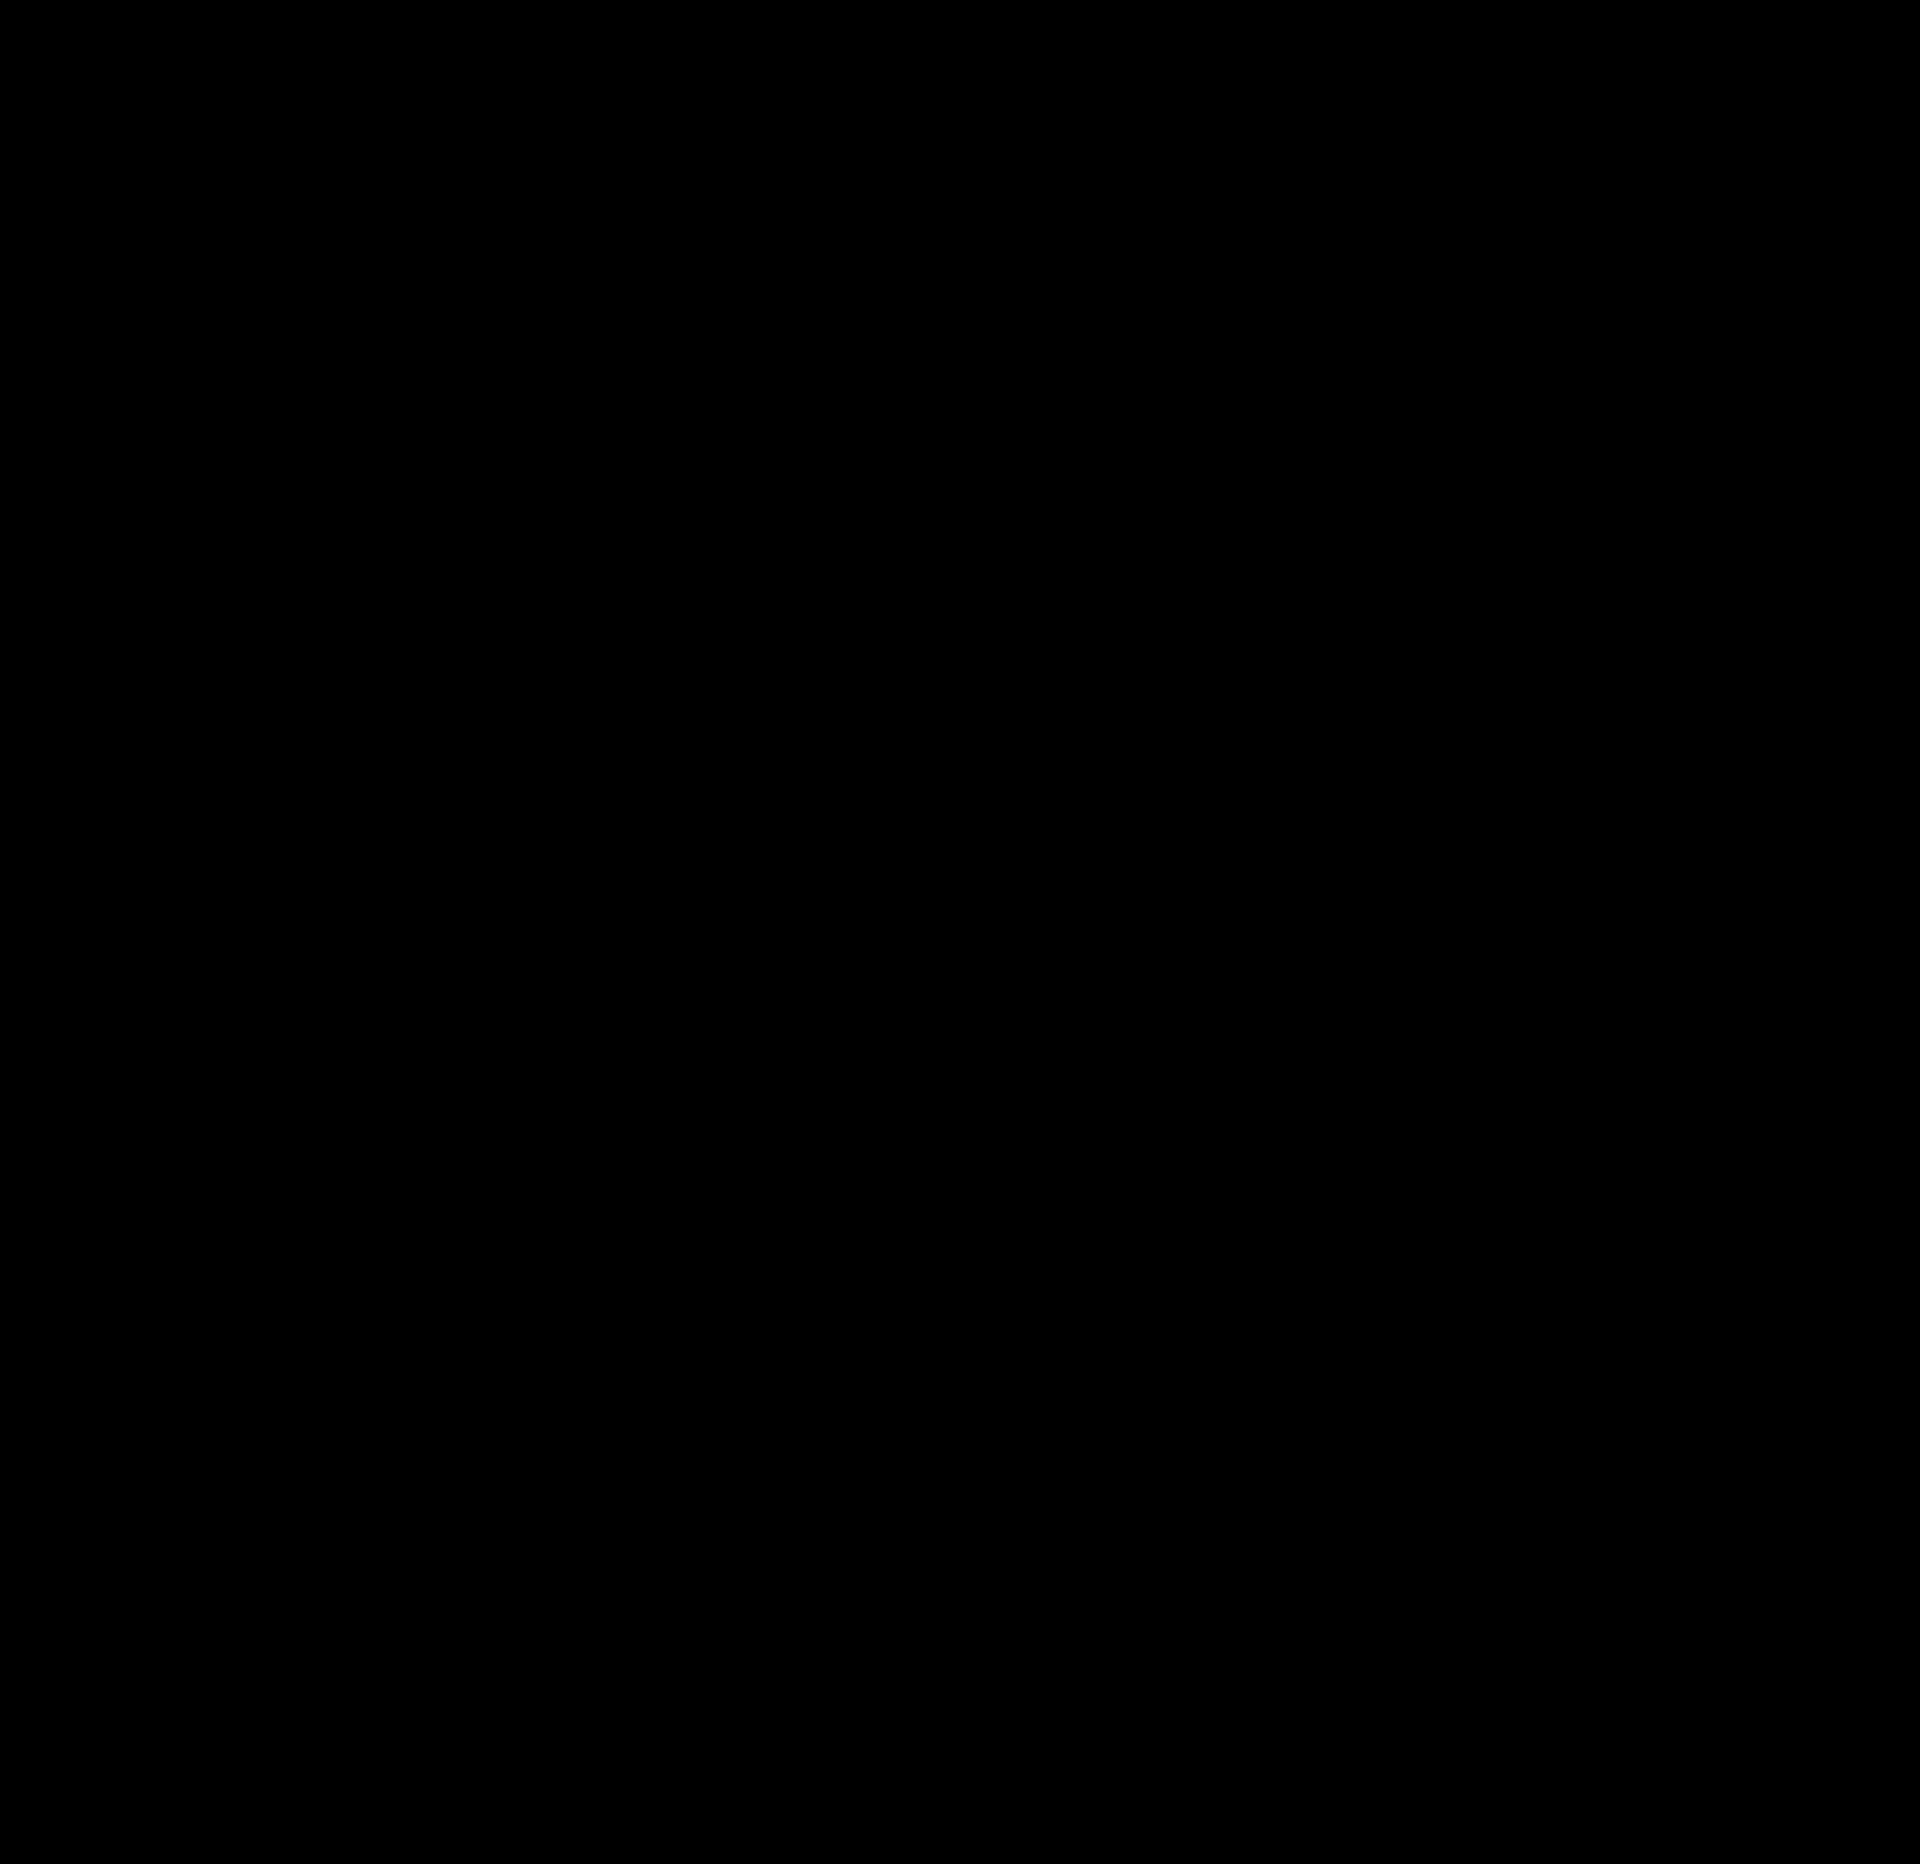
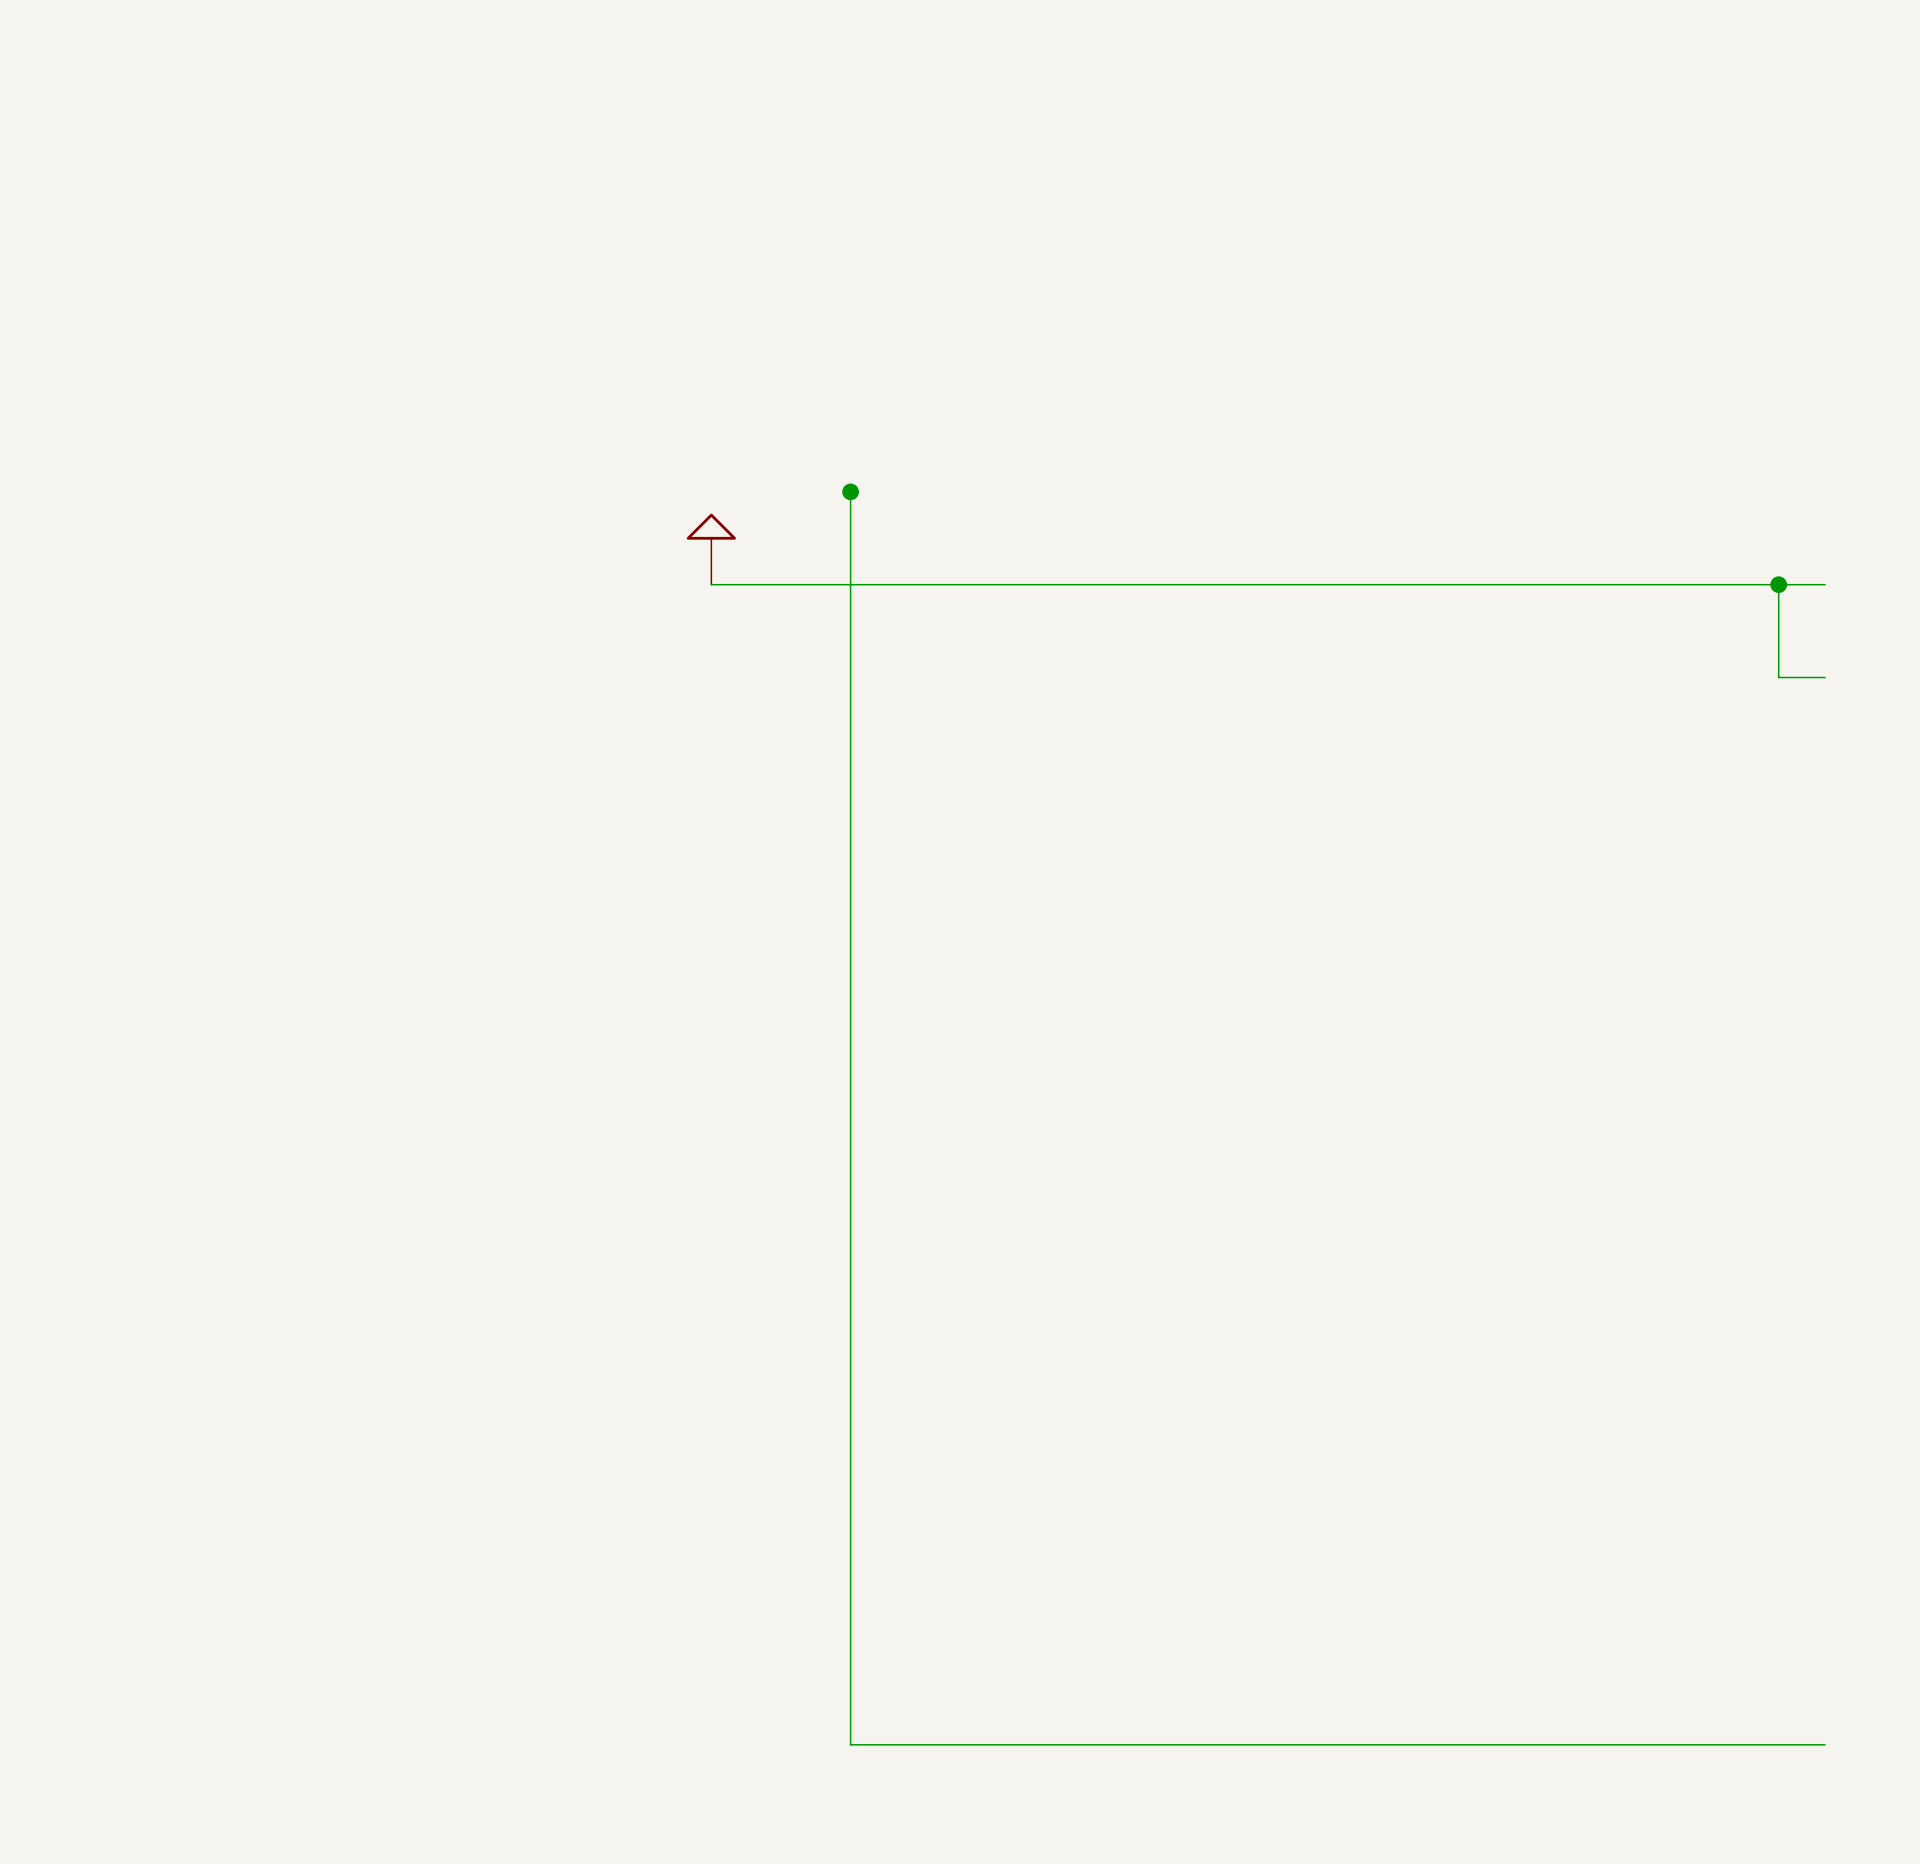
wire: none -> (850, 491) (850, 1744) (1825, 1744)
junction: none -> (850, 491)
power symbol: none -> (711, 549)
wire: none -> (711, 584) (1825, 584)
wire: none -> (1778, 584) (1778, 677) (1825, 677)
junction: none -> (1778, 584)

